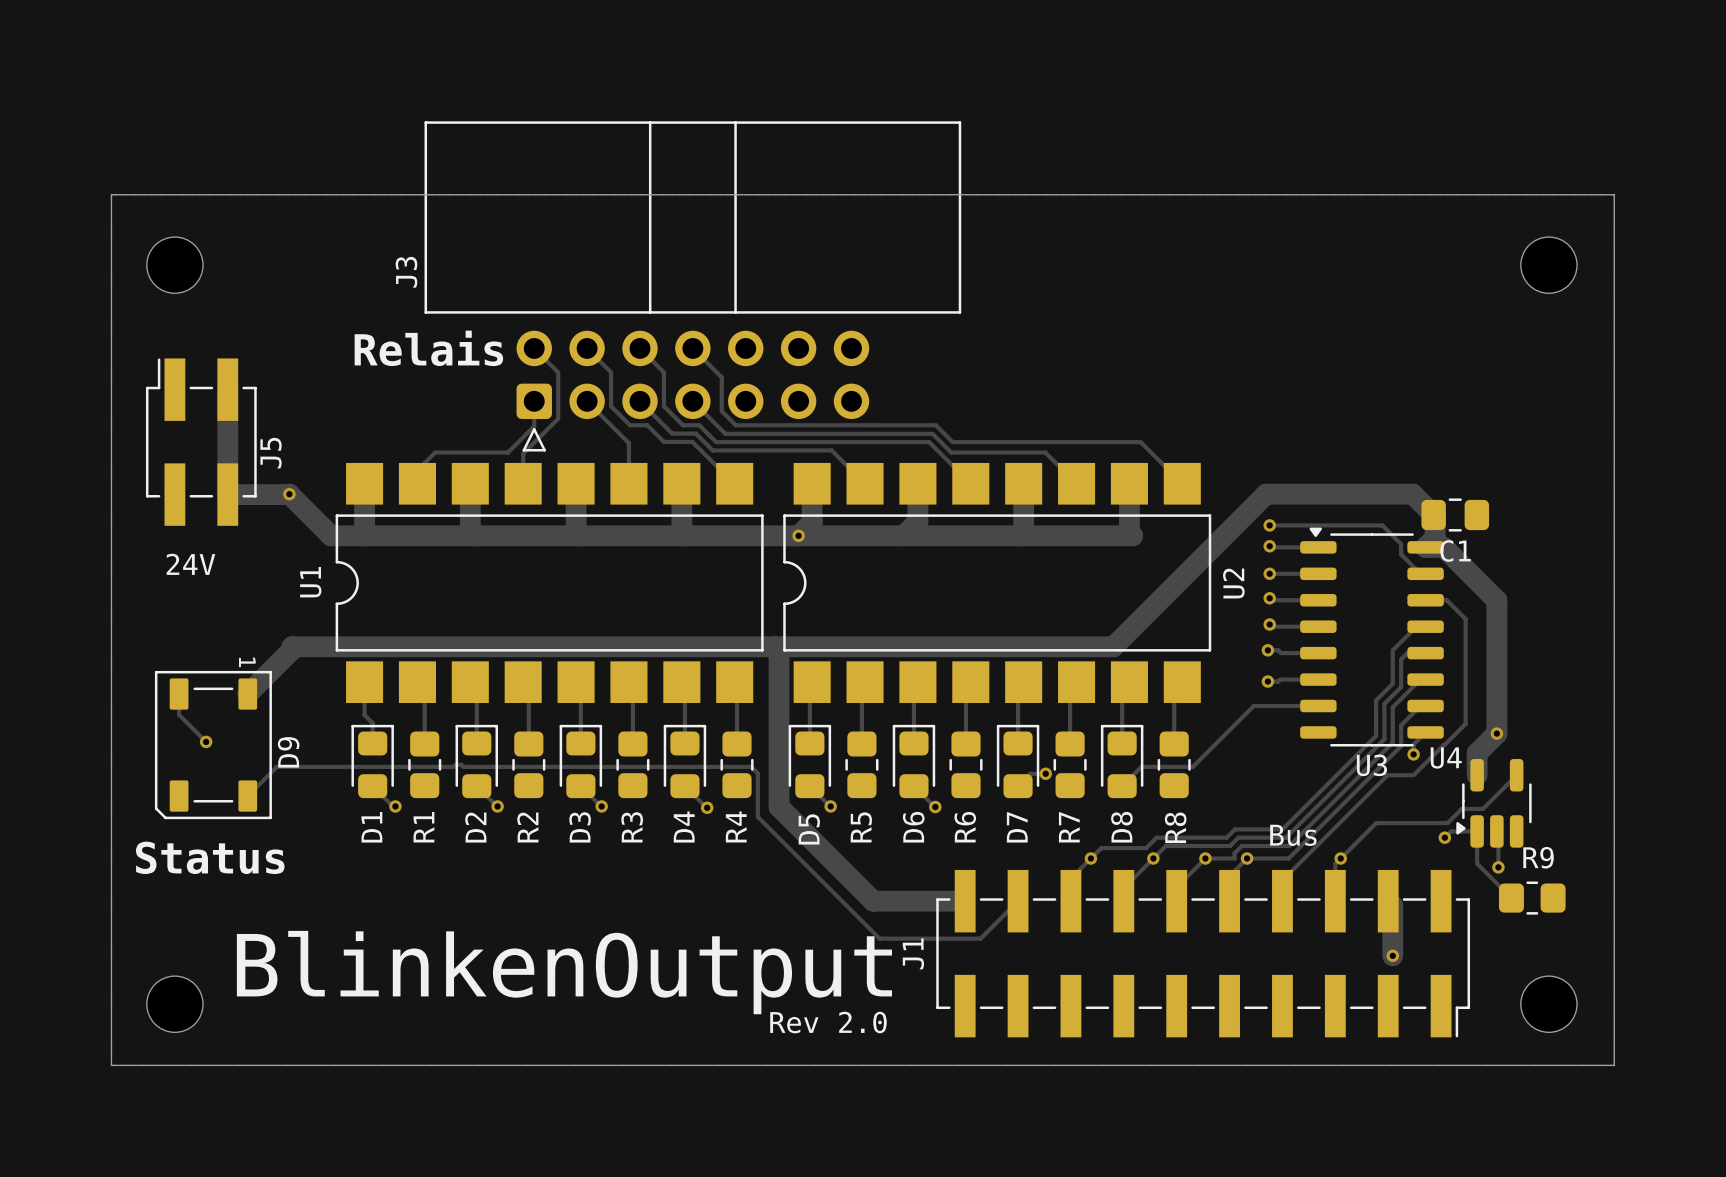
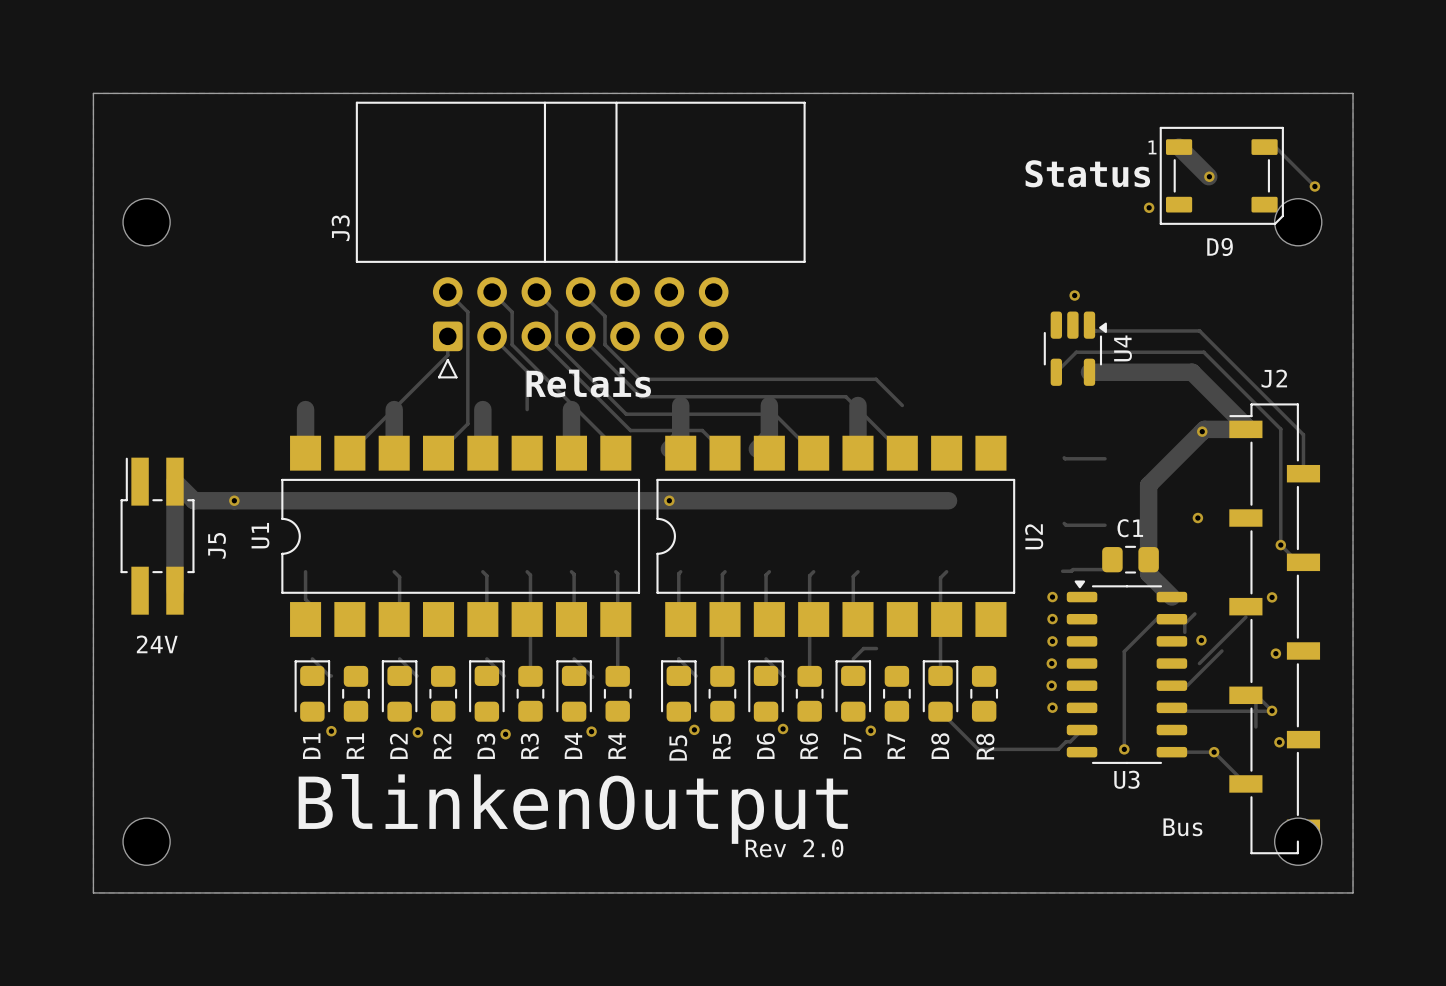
track: none -> (1179, 147) (1209, 176)
track: none -> (1264, 147) (1275, 147) (1314, 186)
board edge: (111, 194) (1614, 194) -> (93, 163) (93, 93) (1353, 93) (1353, 163)
text: none -> Status (1087, 173)
via: none -> (1209, 176)
via: none -> (1314, 186)
via: none -> (1149, 207)
text position: Relais (428, 348) -> Relais (588, 382)
via: none -> (1074, 295)
J5 footprint: [145, 358, 257, 526] -> [120, 457, 195, 615]
track: none -> (1089, 325) (1095, 330) (1199, 330) (1303, 434) (1303, 473)
track: (227, 389) (227, 494) (289, 494) (331, 535) (1132, 535) (1129, 532) (1129, 483) -> none
track: (611, 406) (630, 425) (647, 425) (663, 441) (692, 441) (734, 483) -> (512, 340) (512, 344) (615, 448) (615, 453)
track: (663, 406) (682, 425) (699, 425) (716, 442) (929, 442) (970, 483) -> (556, 340) (556, 344) (626, 414) (774, 414) (813, 453)
track: (558, 418) (523, 453) (523, 488) -> (467, 350) (467, 423) (438, 453)
track: (534, 423) (534, 426) (508, 452) (435, 452) (417, 470) -> (447, 355) (349, 453)
track: (735, 425) (872, 425) -> none
track: (872, 425) (935, 425) (952, 442) (1140, 442) (1182, 483) -> none
track: (672, 433) (695, 433) (712, 450) (831, 450) (865, 483) -> (563, 363) (630, 430) (702, 430) (725, 453)
track: (725, 433) (932, 433) (951, 452) -> (616, 356) (639, 379) (797, 379)
track: none -> (607, 363) (641, 396) (845, 396) (902, 453)
track: none -> (1056, 372) (1076, 352) (1203, 352) (1280, 429) (1280, 545) (1298, 562) (1309, 562)
track: none -> (1089, 372) (1192, 372) (1245, 425) (1245, 429)
via: (289, 494) -> none
track: none -> (1251, 429) (1204, 429) (1148, 485) (1148, 573) (1171, 597) (1176, 592)
via: none -> (1202, 431)
C1 position: (1455, 515) -> (1130, 559)
track: (1269, 525) (1382, 525) (1401, 544) (1401, 554) (1420, 573) (1425, 573) -> none
via: (1269, 525) -> none
via position: (798, 535) -> (669, 500)
via: (1269, 546) -> none
C1 name position: C1 (1455, 550) -> C1 (1130, 528)
text position: 24V (190, 564) -> 24V (157, 644)
track: (1269, 573) (1318, 573) -> none
via: (1269, 573) -> none
U1 position: (549, 582) -> (460, 536)
U2 position: (997, 582) -> (835, 536)
via: none -> (234, 500)
track: none -> (948, 500) (194, 500) (174, 481) (174, 590)
track: (1269, 598) (1271, 600) (1318, 600) -> none
via: (1269, 598) -> none
track: (1425, 600) (1446, 600) (1465, 619) (1465, 723) (1413, 775) (1387, 775) (1282, 880) (1282, 901) -> none
via: none -> (1197, 518)
via: (1269, 624) -> none
track: (1425, 626) (1416, 626) (1392, 650) (1392, 683) (1376, 700) (1376, 735) (1282, 829) (1234, 829) (1226, 837) (1156, 837) (1146, 848) (1101, 848) (1070, 878) (1070, 901) -> none
U3 position: (1371, 637) -> (1126, 672)
track: (779, 649) (782, 646) (1113, 646) (1266, 494) (1412, 494) (1435, 516) (1435, 537) (1425, 547) (1443, 547) (1496, 600) (1496, 733) (1477, 753) (1477, 775) -> none
track: (779, 649) (779, 806) (873, 901) (965, 901) -> none
track: (779, 649) (775, 646) (292, 646) (292, 649) (247, 694) -> none
track: (1267, 650) (1278, 650) (1281, 653) (1318, 653) -> none
via: (1267, 650) -> none
via: none -> (1280, 545)
track: (1425, 653) (1407, 653) (1401, 659) (1401, 687) (1384, 703) (1384, 739) (1285, 837) (1238, 837) (1230, 846) (1165, 846) (1123, 888) (1123, 901) -> none
track: (1425, 679) (1420, 679) (1392, 707) (1392, 742) (1289, 846) (1241, 846) (1234, 853) (1234, 858) (1205, 858) (1176, 887) (1176, 901) -> none
via: (1267, 681) -> none
track: (417, 682) (424, 689) (424, 744) -> none
track: (523, 682) (528, 687) (528, 744) -> none
track: (1076, 682) (1070, 688) (1070, 744) -> none
track: (1182, 682) (1174, 690) (1174, 744) -> none
track: (179, 694) (179, 714) (206, 741) -> none
track: (1318, 706) (1253, 706) (1192, 766) (1141, 766) (1122, 786) -> none
track: (1425, 706) (1420, 706) (1401, 725) (1401, 746) (1288, 858) (1247, 858) (1229, 875) (1229, 901) -> none
via: none -> (1052, 597)
via: none -> (1272, 597)
via: (1496, 733) -> none
track: none -> (1245, 617) (1199, 663)
via: none -> (1052, 619)
track: none -> (1171, 619) (1156, 619) (1124, 651) (1124, 749)
track: none -> (946, 619) (940, 625) (940, 675)
via: (206, 741) -> none
track: none -> (530, 623) (530, 676)
track: none -> (617, 623) (617, 676)
track: none -> (722, 623) (722, 676)
track: none -> (809, 623) (809, 676)
D9 rotation: 0° (213, 745) -> 90° counterclockwise (1221, 175)
D9 position: (213, 745) -> (1221, 175)
J2: none -> (1274, 628)
D9 name position: D9 (288, 752) -> D9 (1220, 247)
via position: (1413, 754) -> (1201, 640)
U4 name position: U4 (1446, 758) -> U4 (1123, 348)
D1 position: (372, 761) -> (312, 691)
D2 position: (476, 761) -> (399, 691)
D3 position: (580, 761) -> (486, 691)
D4 position: (684, 761) -> (574, 691)
D5 position: (809, 761) -> (678, 691)
D6 position: (913, 761) -> (766, 691)
D7 position: (1018, 761) -> (853, 691)
D8 position: (1122, 761) -> (940, 691)
R1 position: (424, 764) -> (355, 693)
R2 position: (528, 764) -> (443, 693)
R3 position: (632, 764) -> (530, 693)
R4 position: (737, 764) -> (617, 693)
R5 position: (861, 764) -> (722, 693)
R6 position: (966, 764) -> (809, 693)
R7 position: (1070, 764) -> (896, 693)
R8 position: (1174, 764) -> (984, 693)
via: none -> (1052, 641)
via: (1045, 773) -> none
track: (1516, 775) (1482, 808) (1461, 808) (1447, 823) (1376, 823) (1335, 863) (1335, 901) -> none
track: none -> (1221, 650) (1187, 685)
via: none -> (1275, 653)
via: none -> (1051, 663)
track: (247, 796) (276, 766) (453, 766) (455, 764) (463, 766) (751, 766) (757, 773) (757, 816) (879, 938) (980, 938) (1018, 901) -> none
U4 rotation: 0° (1493, 803) -> 180° (1075, 348)
U4 position: (1493, 803) -> (1075, 348)
via: (395, 806) -> none
via: (497, 806) -> none
via: (601, 806) -> none
via: (830, 806) -> none
via: (707, 807) -> none
via: (935, 807) -> none
via: none -> (1051, 685)
track: none -> (1245, 695) (1256, 695) (1272, 710) (1175, 711) (1171, 707)
text position: Bus (1293, 835) -> Bus (1182, 827)
track: (1444, 837) (1451, 831) (1477, 831) (1477, 863) (1511, 898) -> none
via: (1444, 837) -> none
via: none -> (1272, 710)
track: none -> (940, 711) (978, 749) (1058, 749) (1066, 741) (1070, 741) (1082, 730)
text: Status (210, 857) -> none
via: (1090, 858) -> none
via: (1153, 858) -> none
via: (1205, 858) -> none
via position: (1247, 858) -> (1052, 707)
via position: (1340, 858) -> (1124, 749)
via: (1498, 867) -> none
via: none -> (783, 728)
via: none -> (694, 729)
via: none -> (870, 730)
via: none -> (331, 731)
via: none -> (591, 731)
via: none -> (417, 732)
via: none -> (505, 734)
via: none -> (1279, 742)
track: none -> (1171, 752) (1214, 752) (1245, 783)
via: none -> (1214, 752)
R9: (1532, 898) -> none
track: (1388, 901) (1392, 905) (1392, 955) -> none
J1: (1203, 953) -> none
via: (1392, 955) -> none
text position: BlinkenOutput (564, 972) -> BlinkenOutput (573, 808)
text position: Rev 2.0 (828, 1022) -> Rev 2.0 (794, 848)

